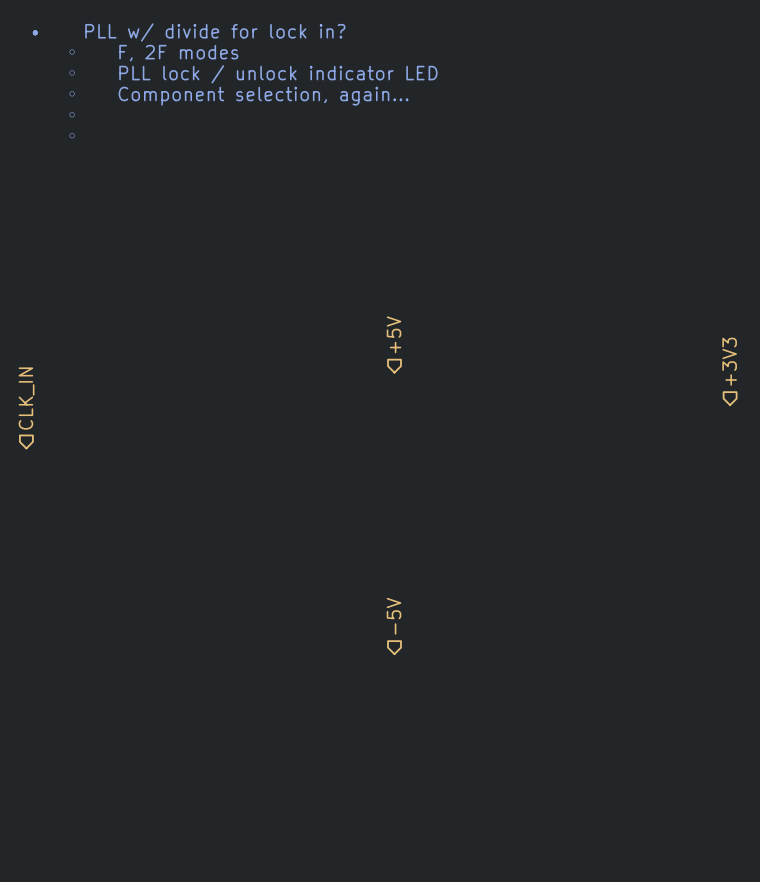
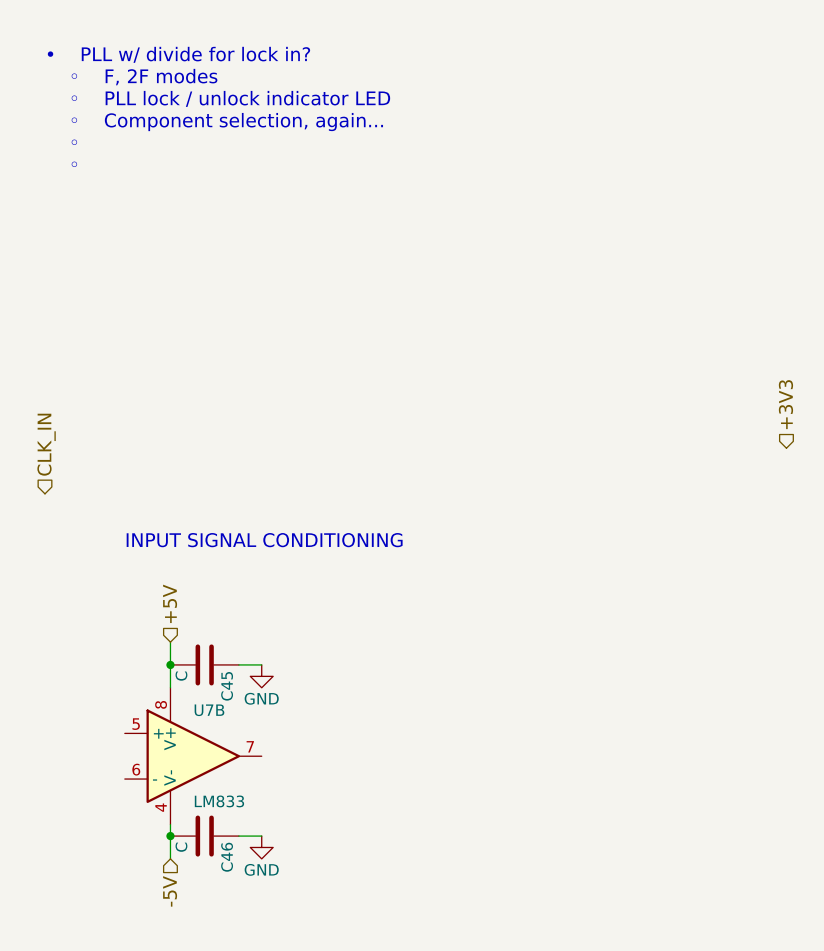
hierarchical label: +5V (394, 334) -> none
text: none -> INPUT SIGNAL CONDITIONING (264, 540)
hierarchical label: none -> +5V (170, 603)
wire: none -> (170, 642) (170, 687)
junction: none -> (170, 664)
C45: none -> C (204, 664)
wire: none -> (238, 664) (261, 664)
hierarchical label: -5V (394, 616) -> none
power symbol: none -> GND (261, 676)
U7B: none -> LM833 (193, 756)
wire: none -> (170, 824) (170, 858)
junction: none -> (170, 836)
C46: none -> C (204, 836)
wire: none -> (238, 836) (261, 836)
power symbol: none -> GND (261, 847)
hierarchical label: none -> -5V (170, 891)

